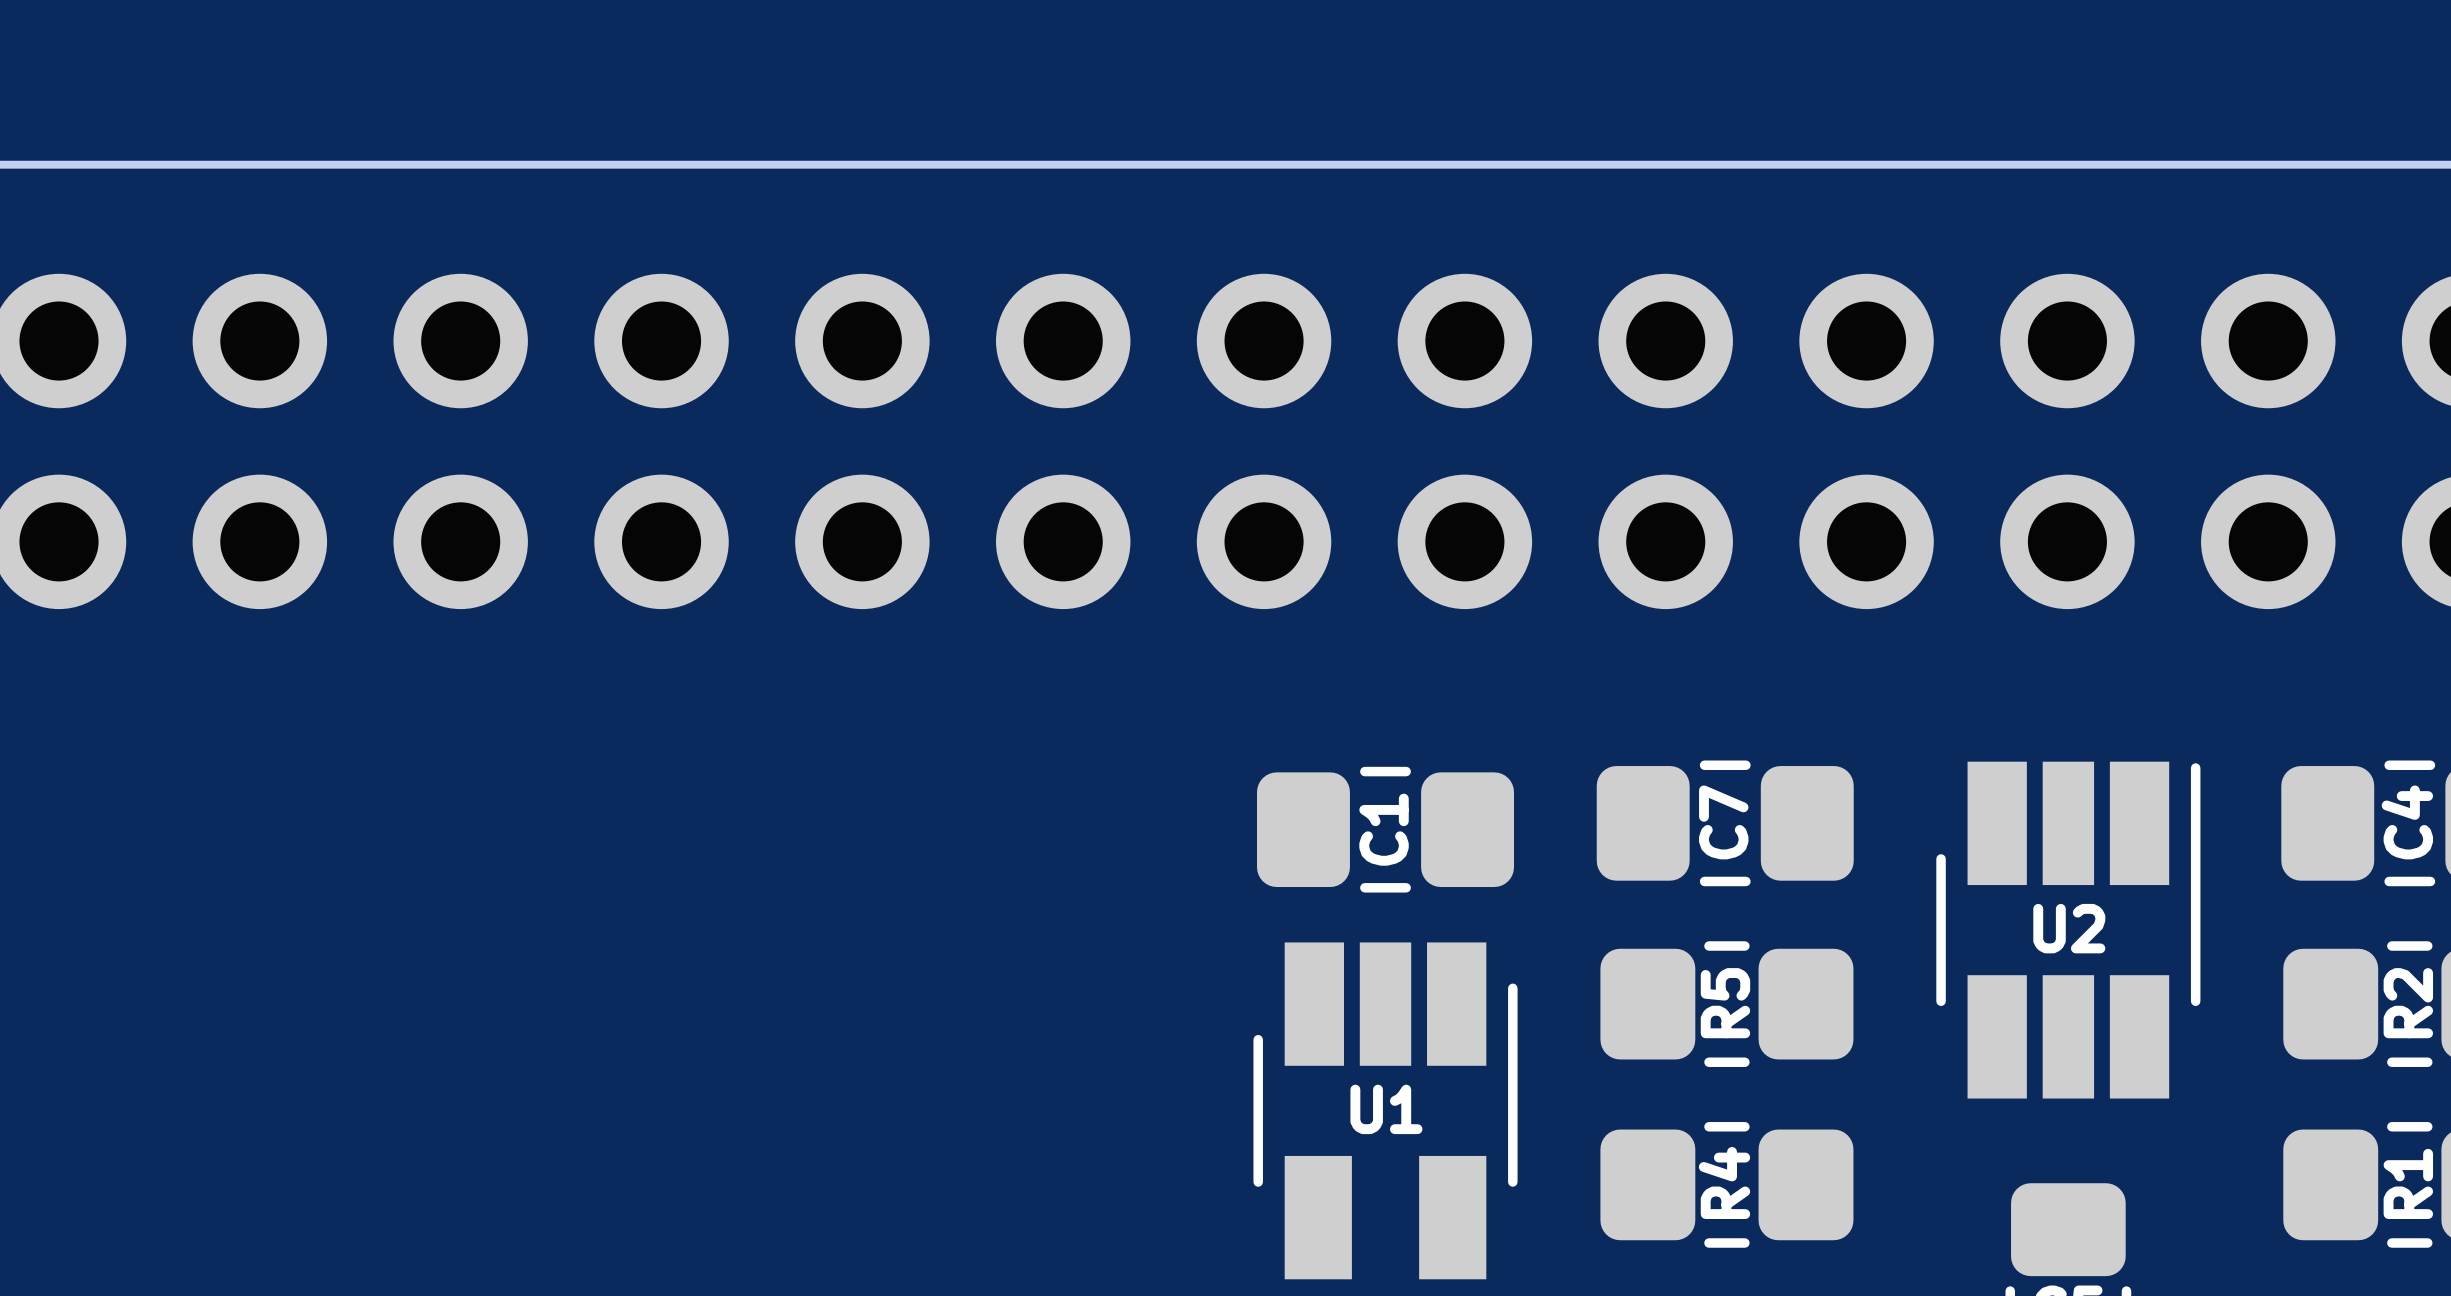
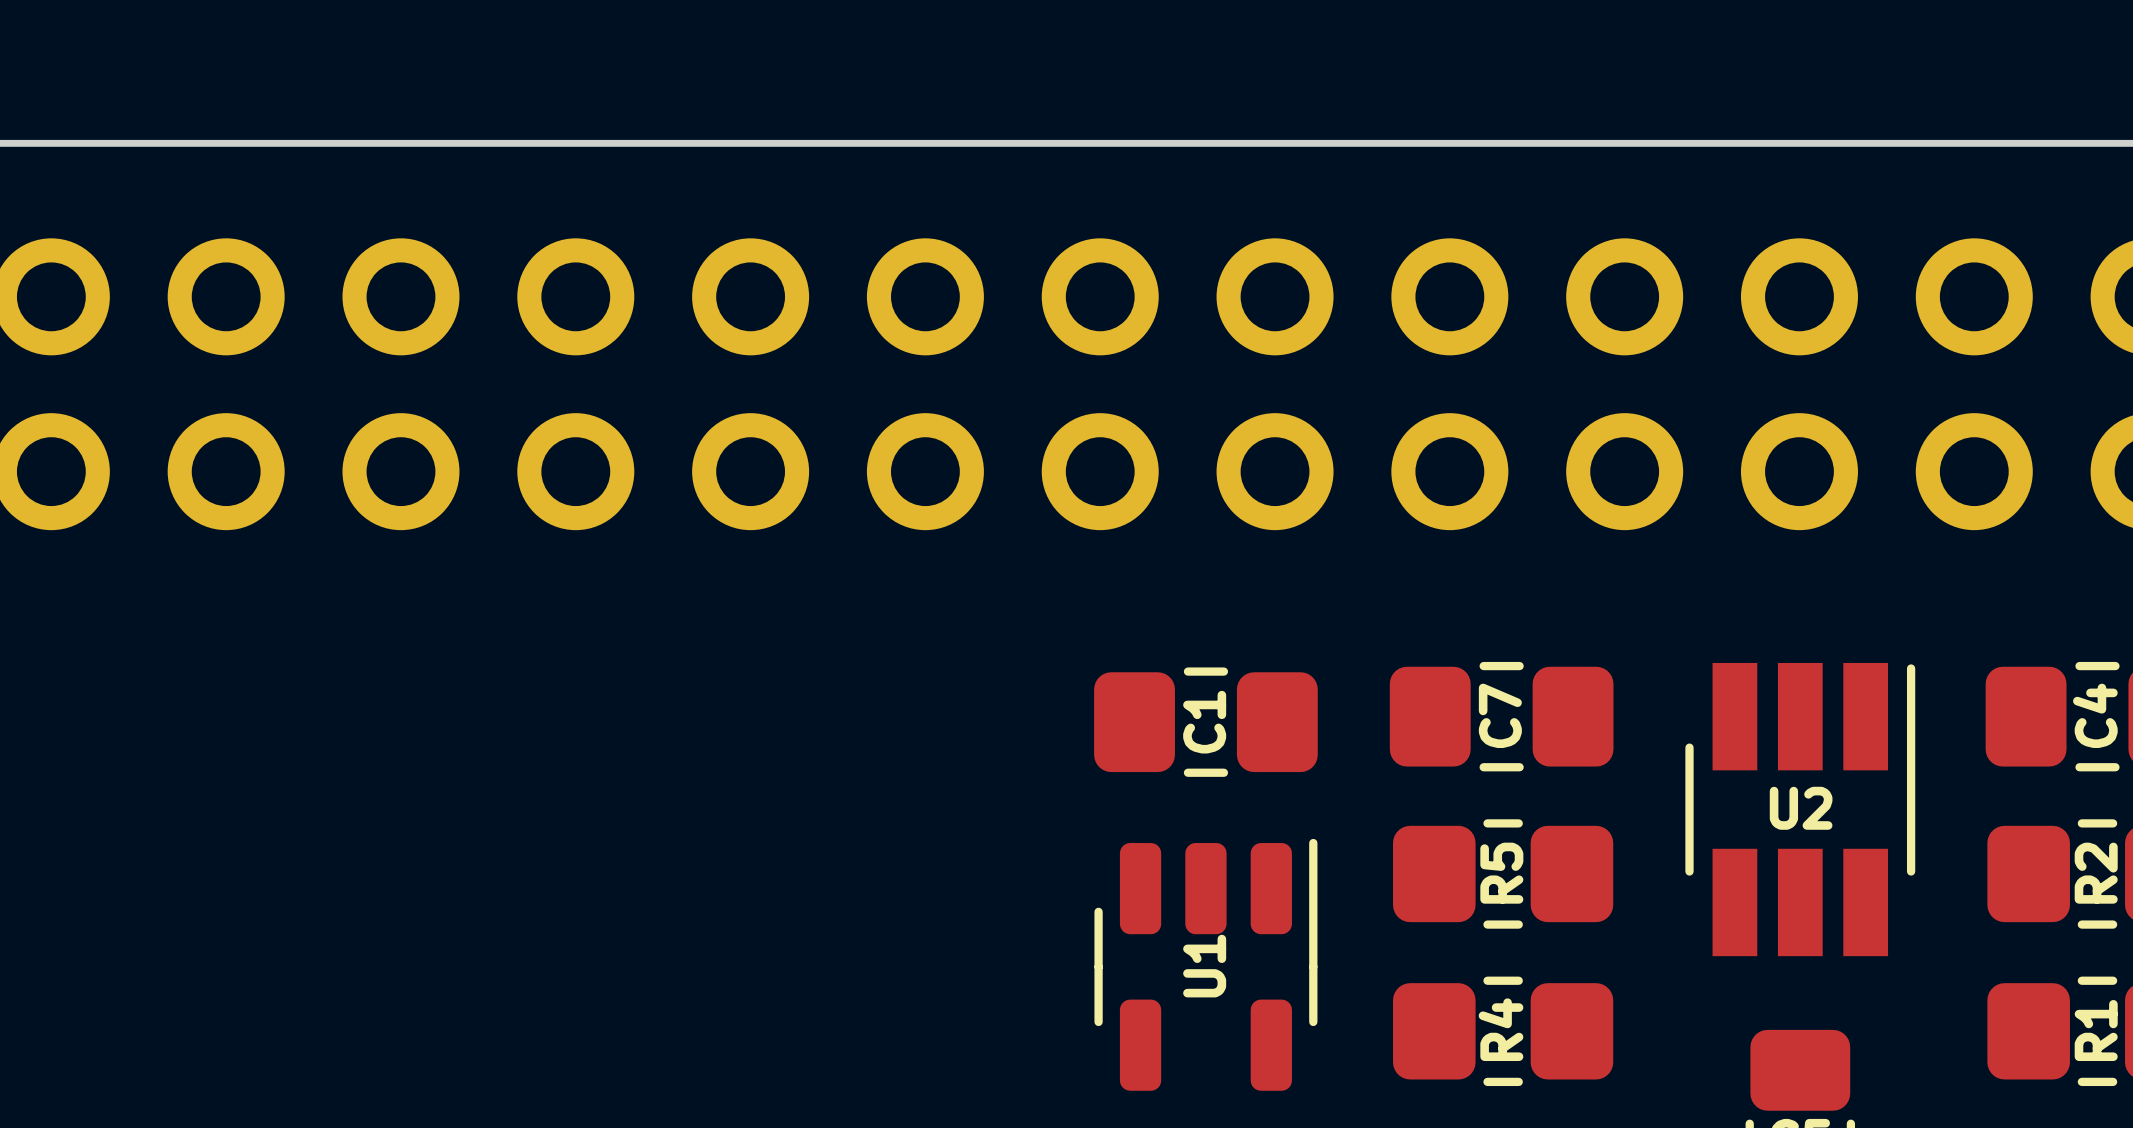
U2 footprint: [1936, 761, 2201, 1099] -> [1685, 662, 1916, 957]
U1 footprint: [1253, 942, 1518, 1280] -> [1094, 838, 1318, 1091]
U1 name rotation: 0° (1386, 1109) -> 90° counterclockwise (1204, 966)

